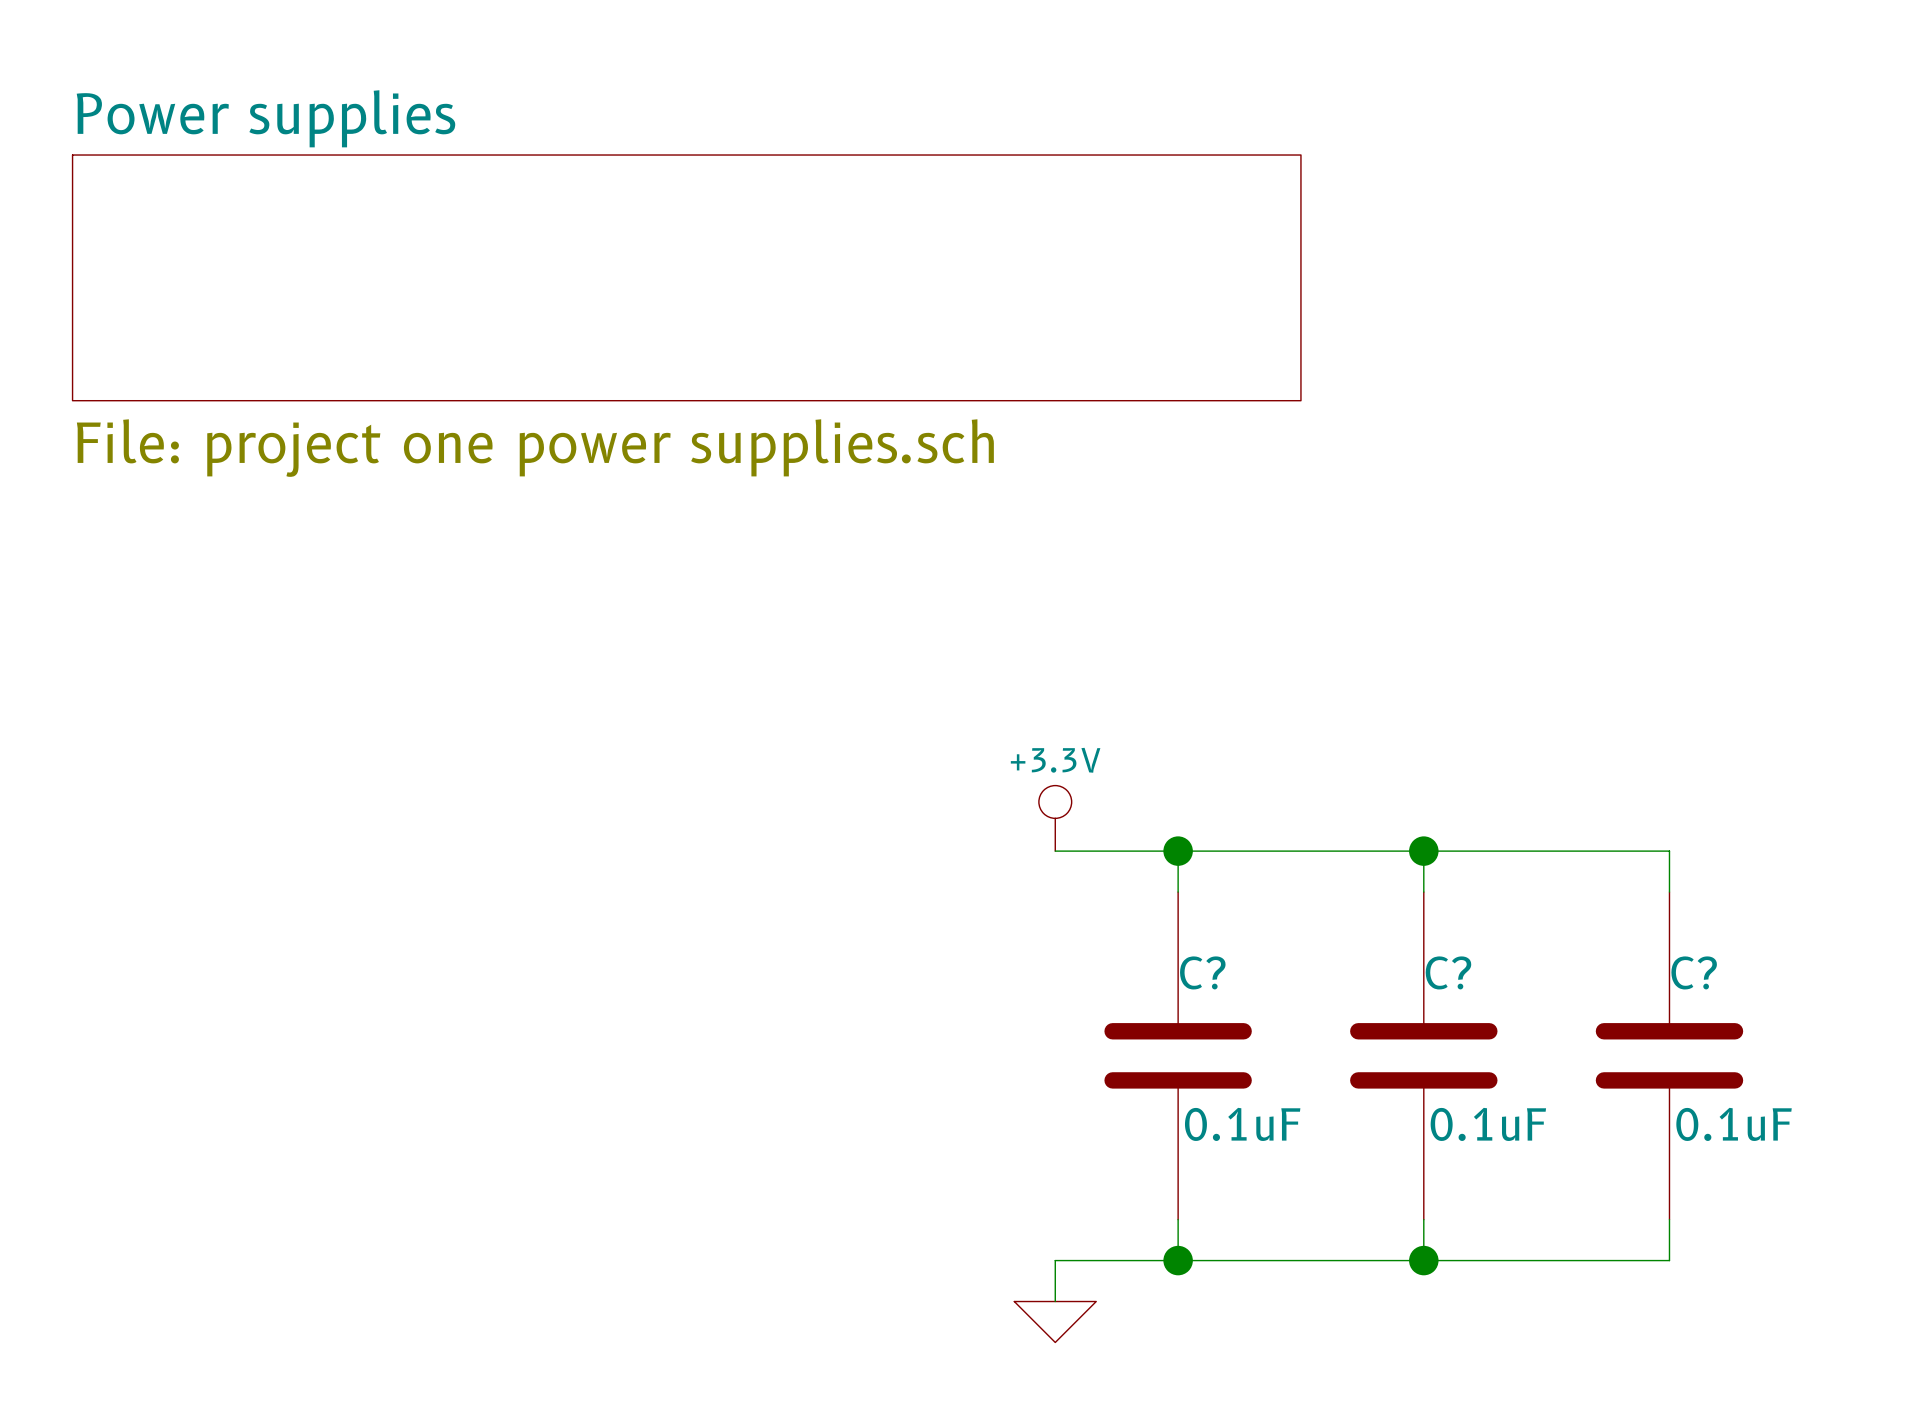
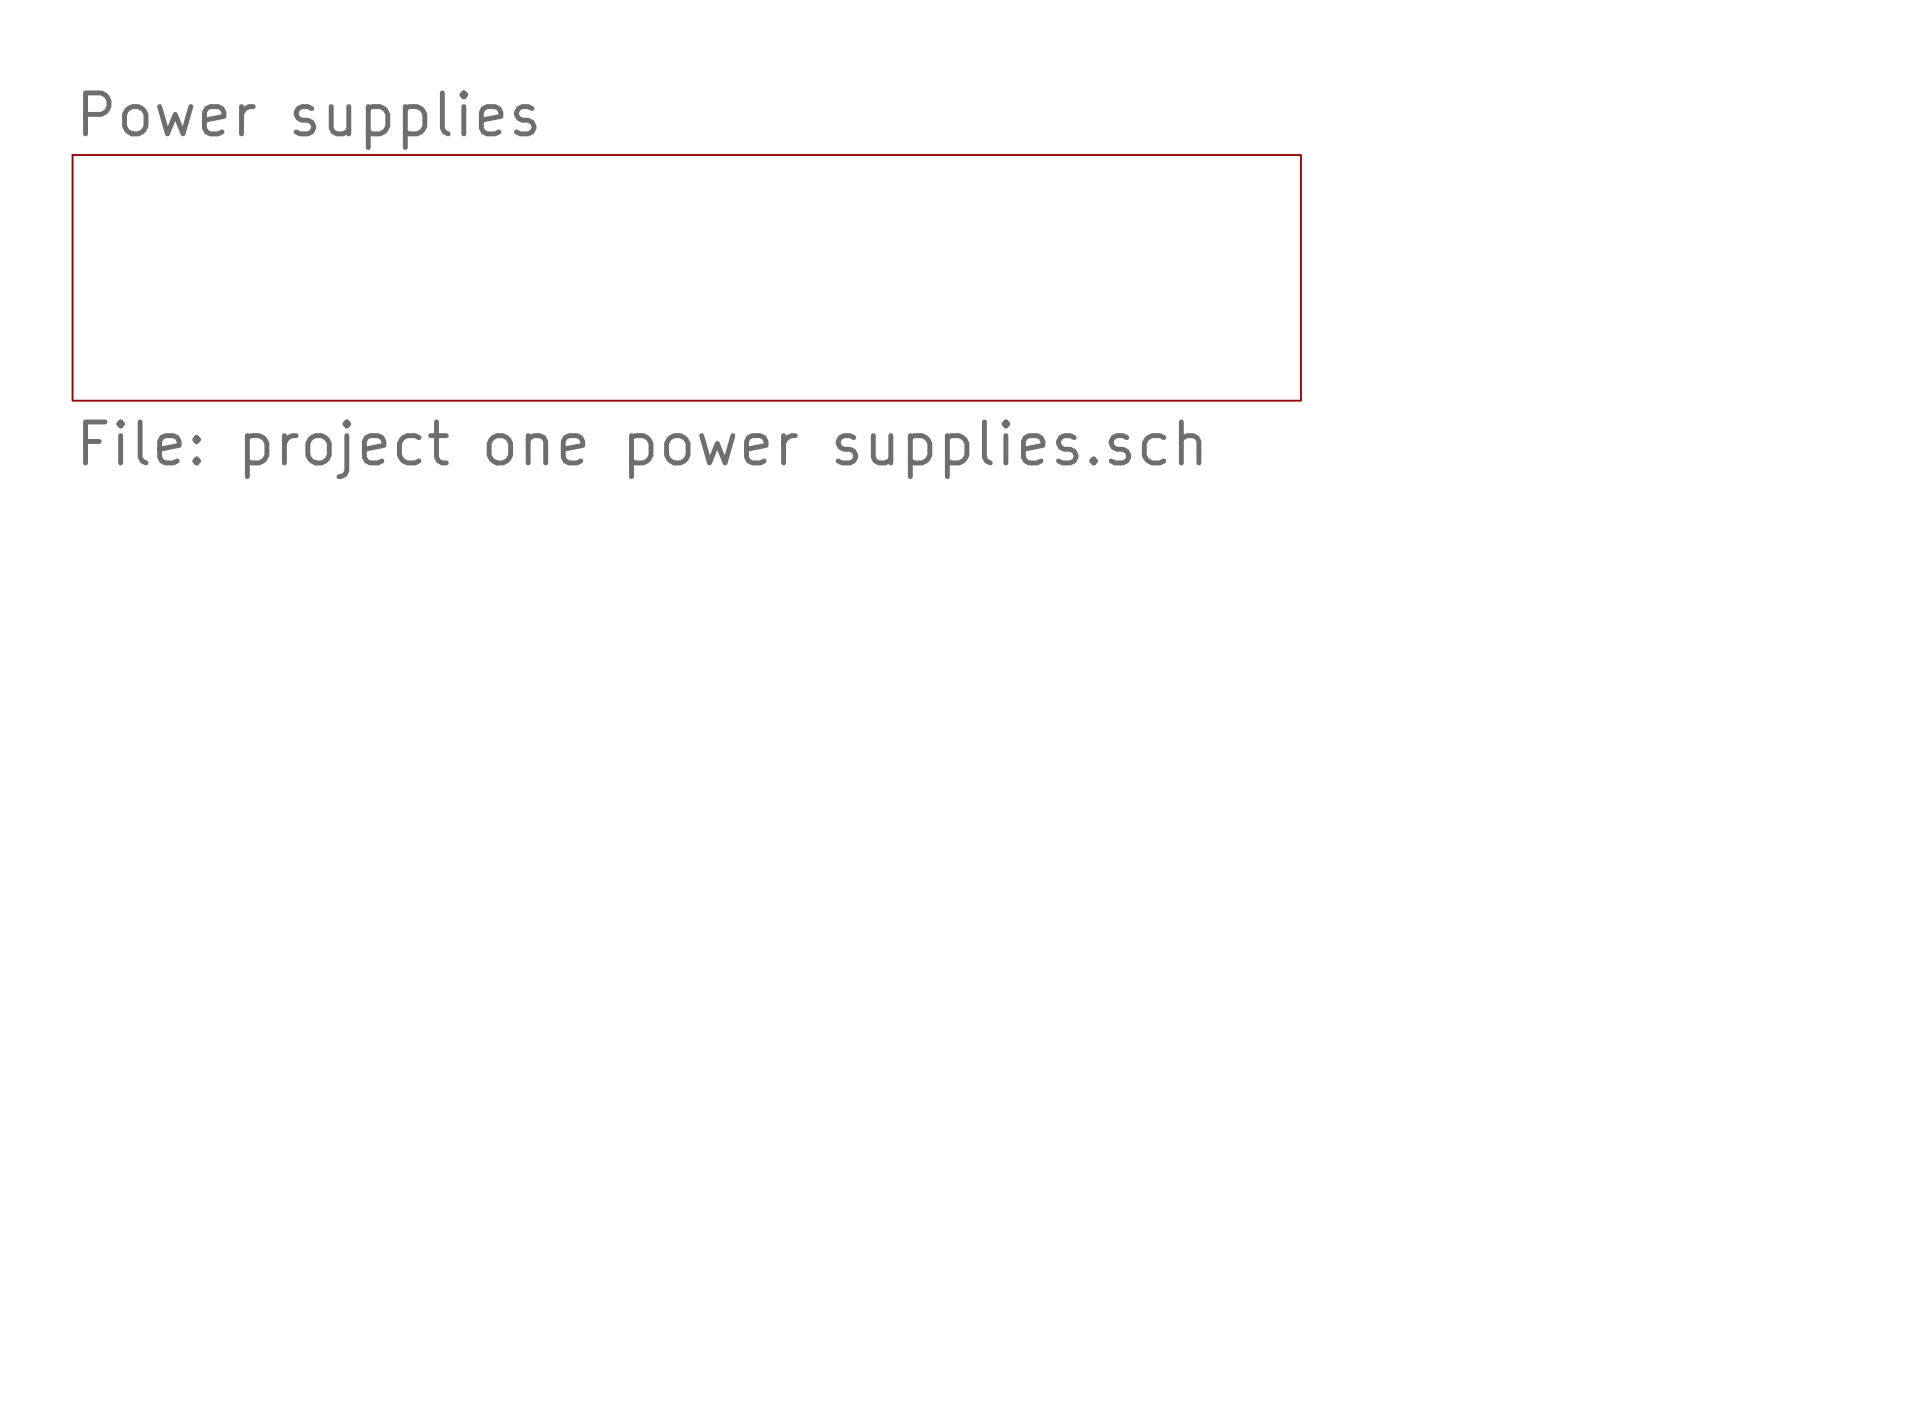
power symbol: +3.3V (1055, 818) -> none
wire: (1055, 851) (1669, 851) (1669, 892) -> none
wire: (1178, 851) (1178, 892) -> none
junction: (1178, 851) -> none
wire: (1423, 851) (1423, 892) -> none
junction: (1423, 851) -> none
C?: 0.1uF (1178, 1055) -> none
C?: 0.1uF (1423, 1055) -> none
C?: 0.1uF (1669, 1055) -> none
wire: (1178, 1219) (1178, 1260) -> none
wire: (1423, 1219) (1423, 1260) -> none
wire: (1669, 1219) (1669, 1260) (1055, 1260) (1055, 1301) -> none
junction: (1178, 1260) -> none
junction: (1423, 1260) -> none
power symbol: (1055, 1321) -> none

